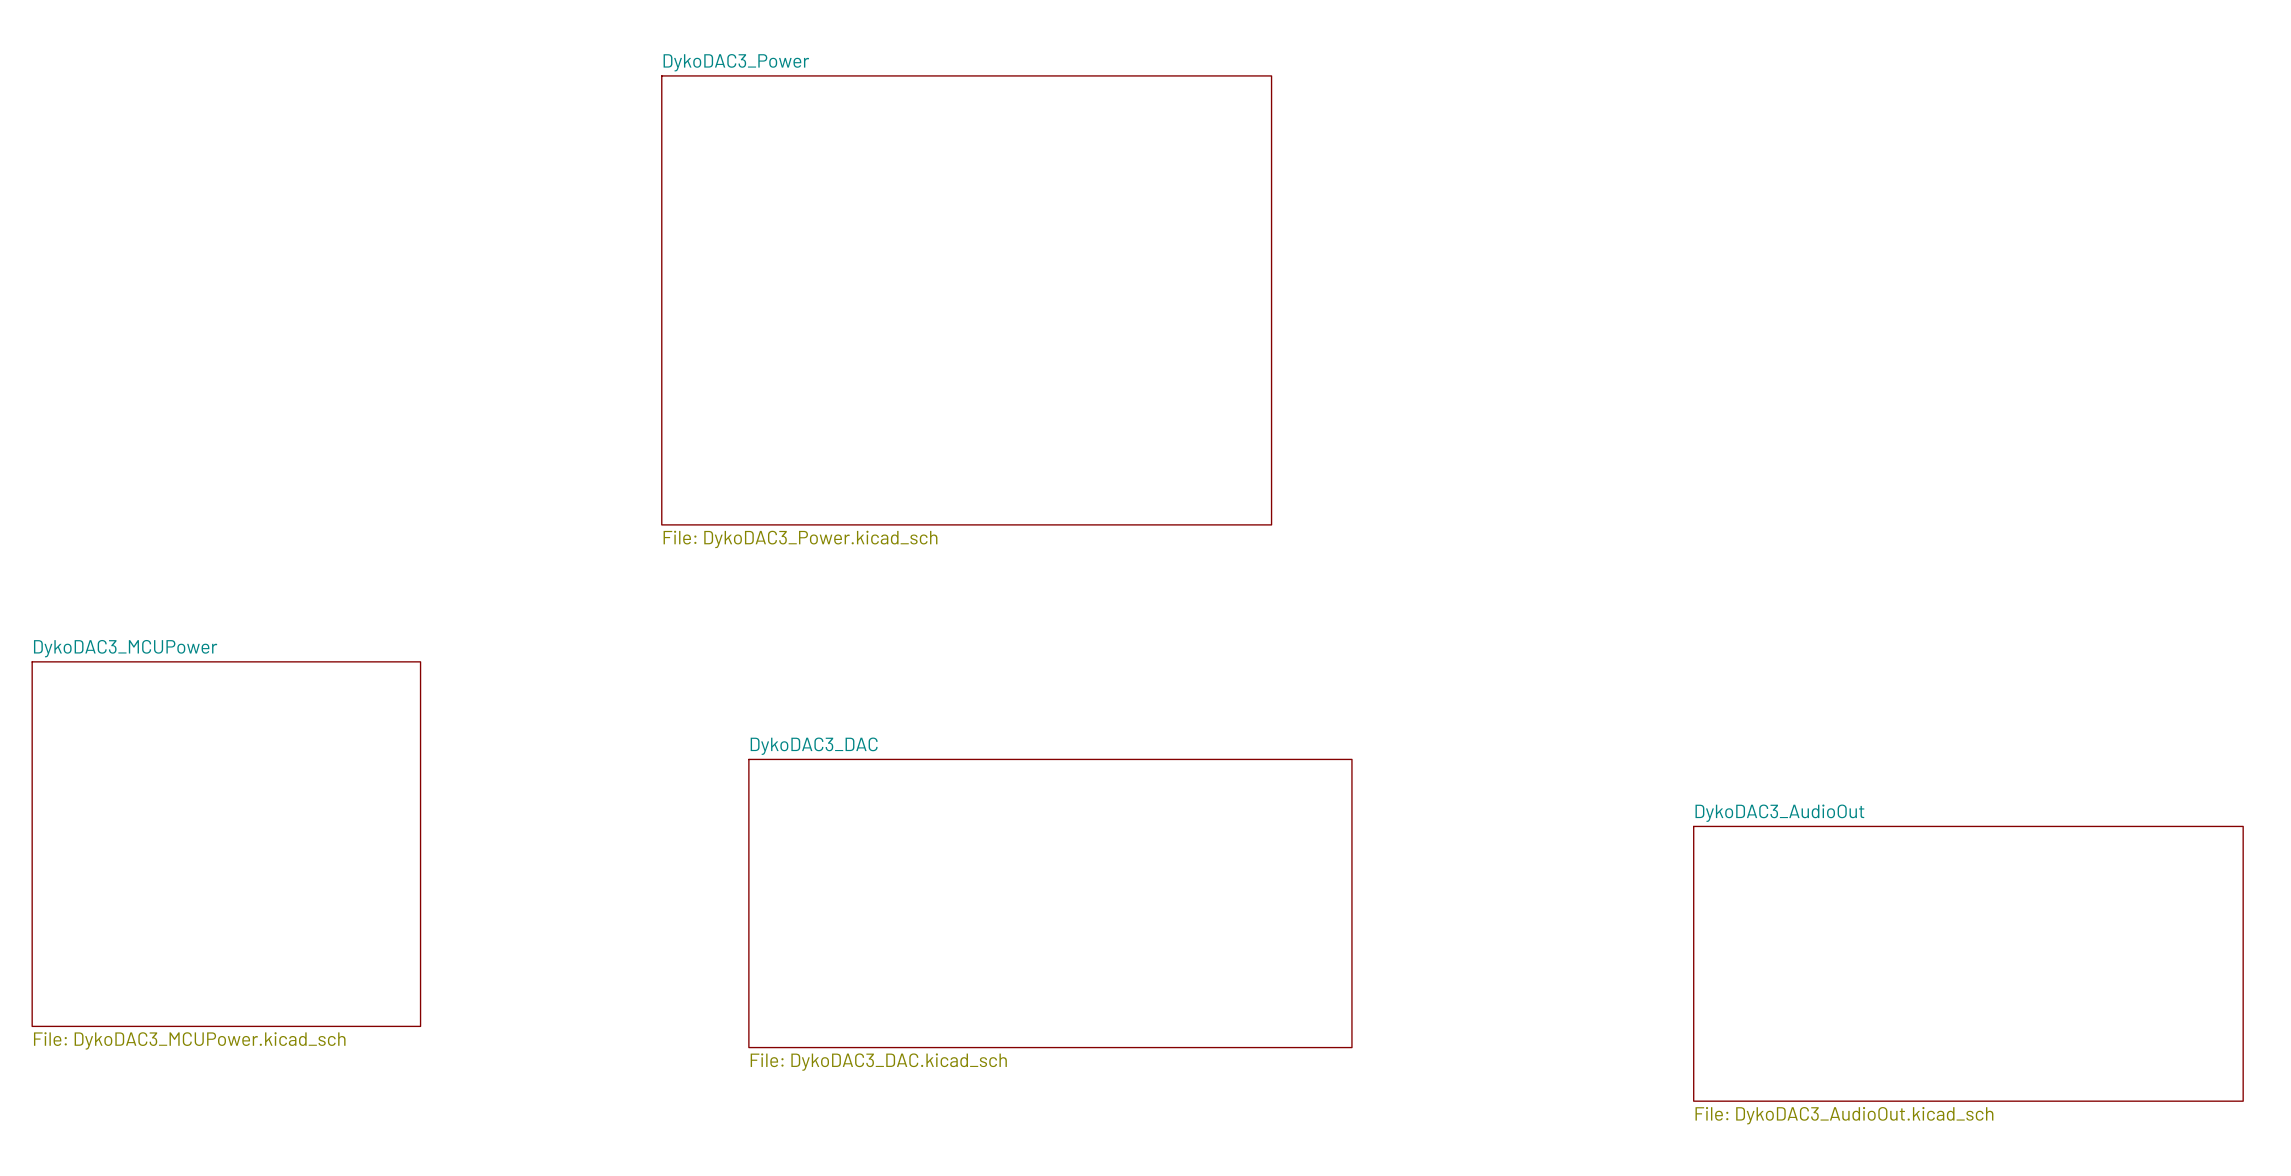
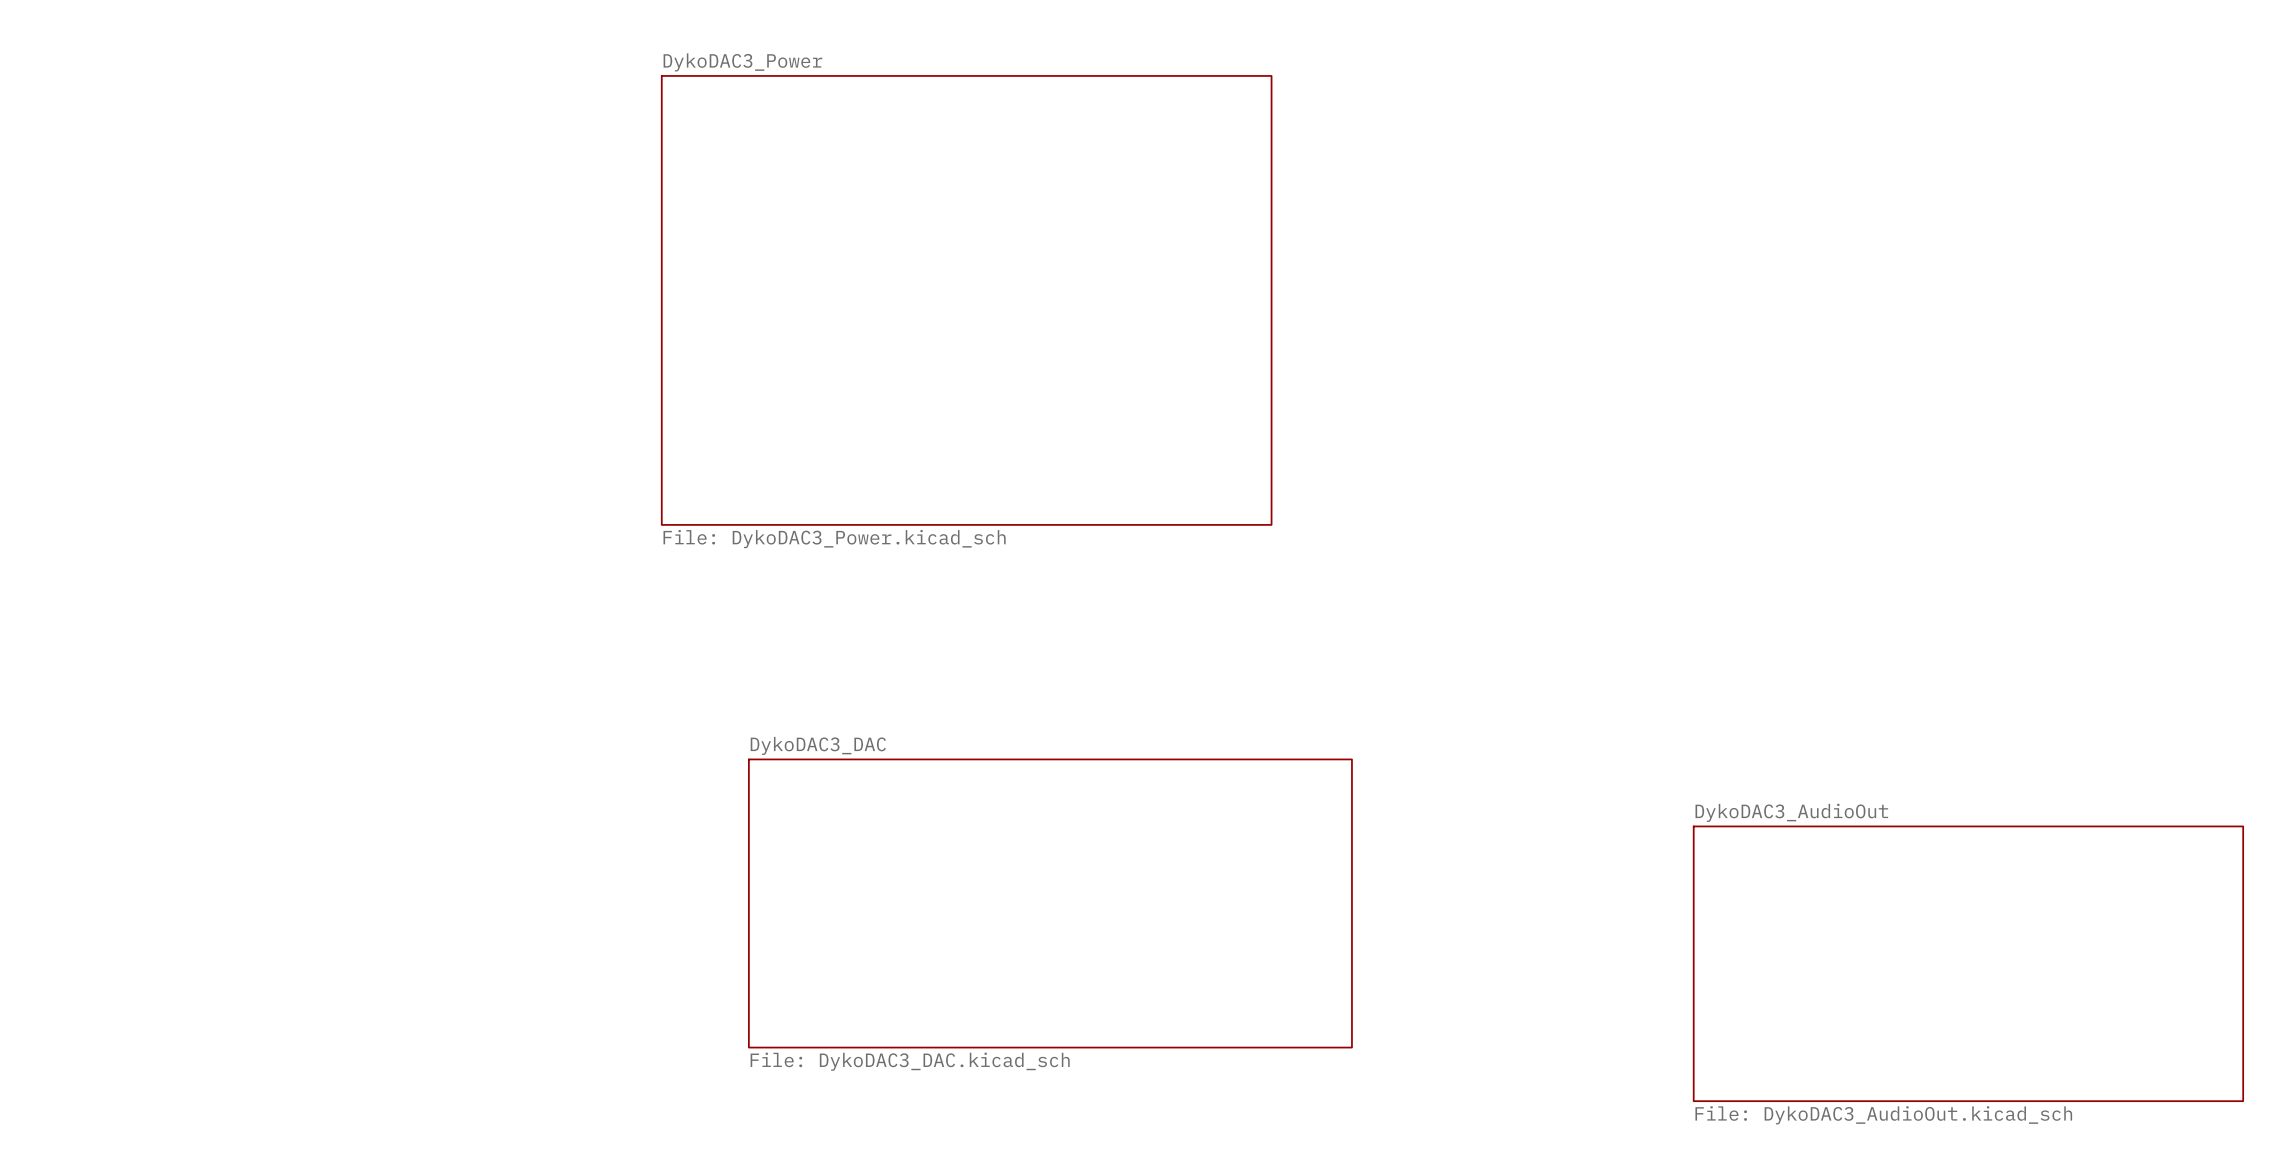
sheet DykoDAC3_MCUPower: File: DykoDAC3_MCUPower.kicad_sch (226, 844) -> none

